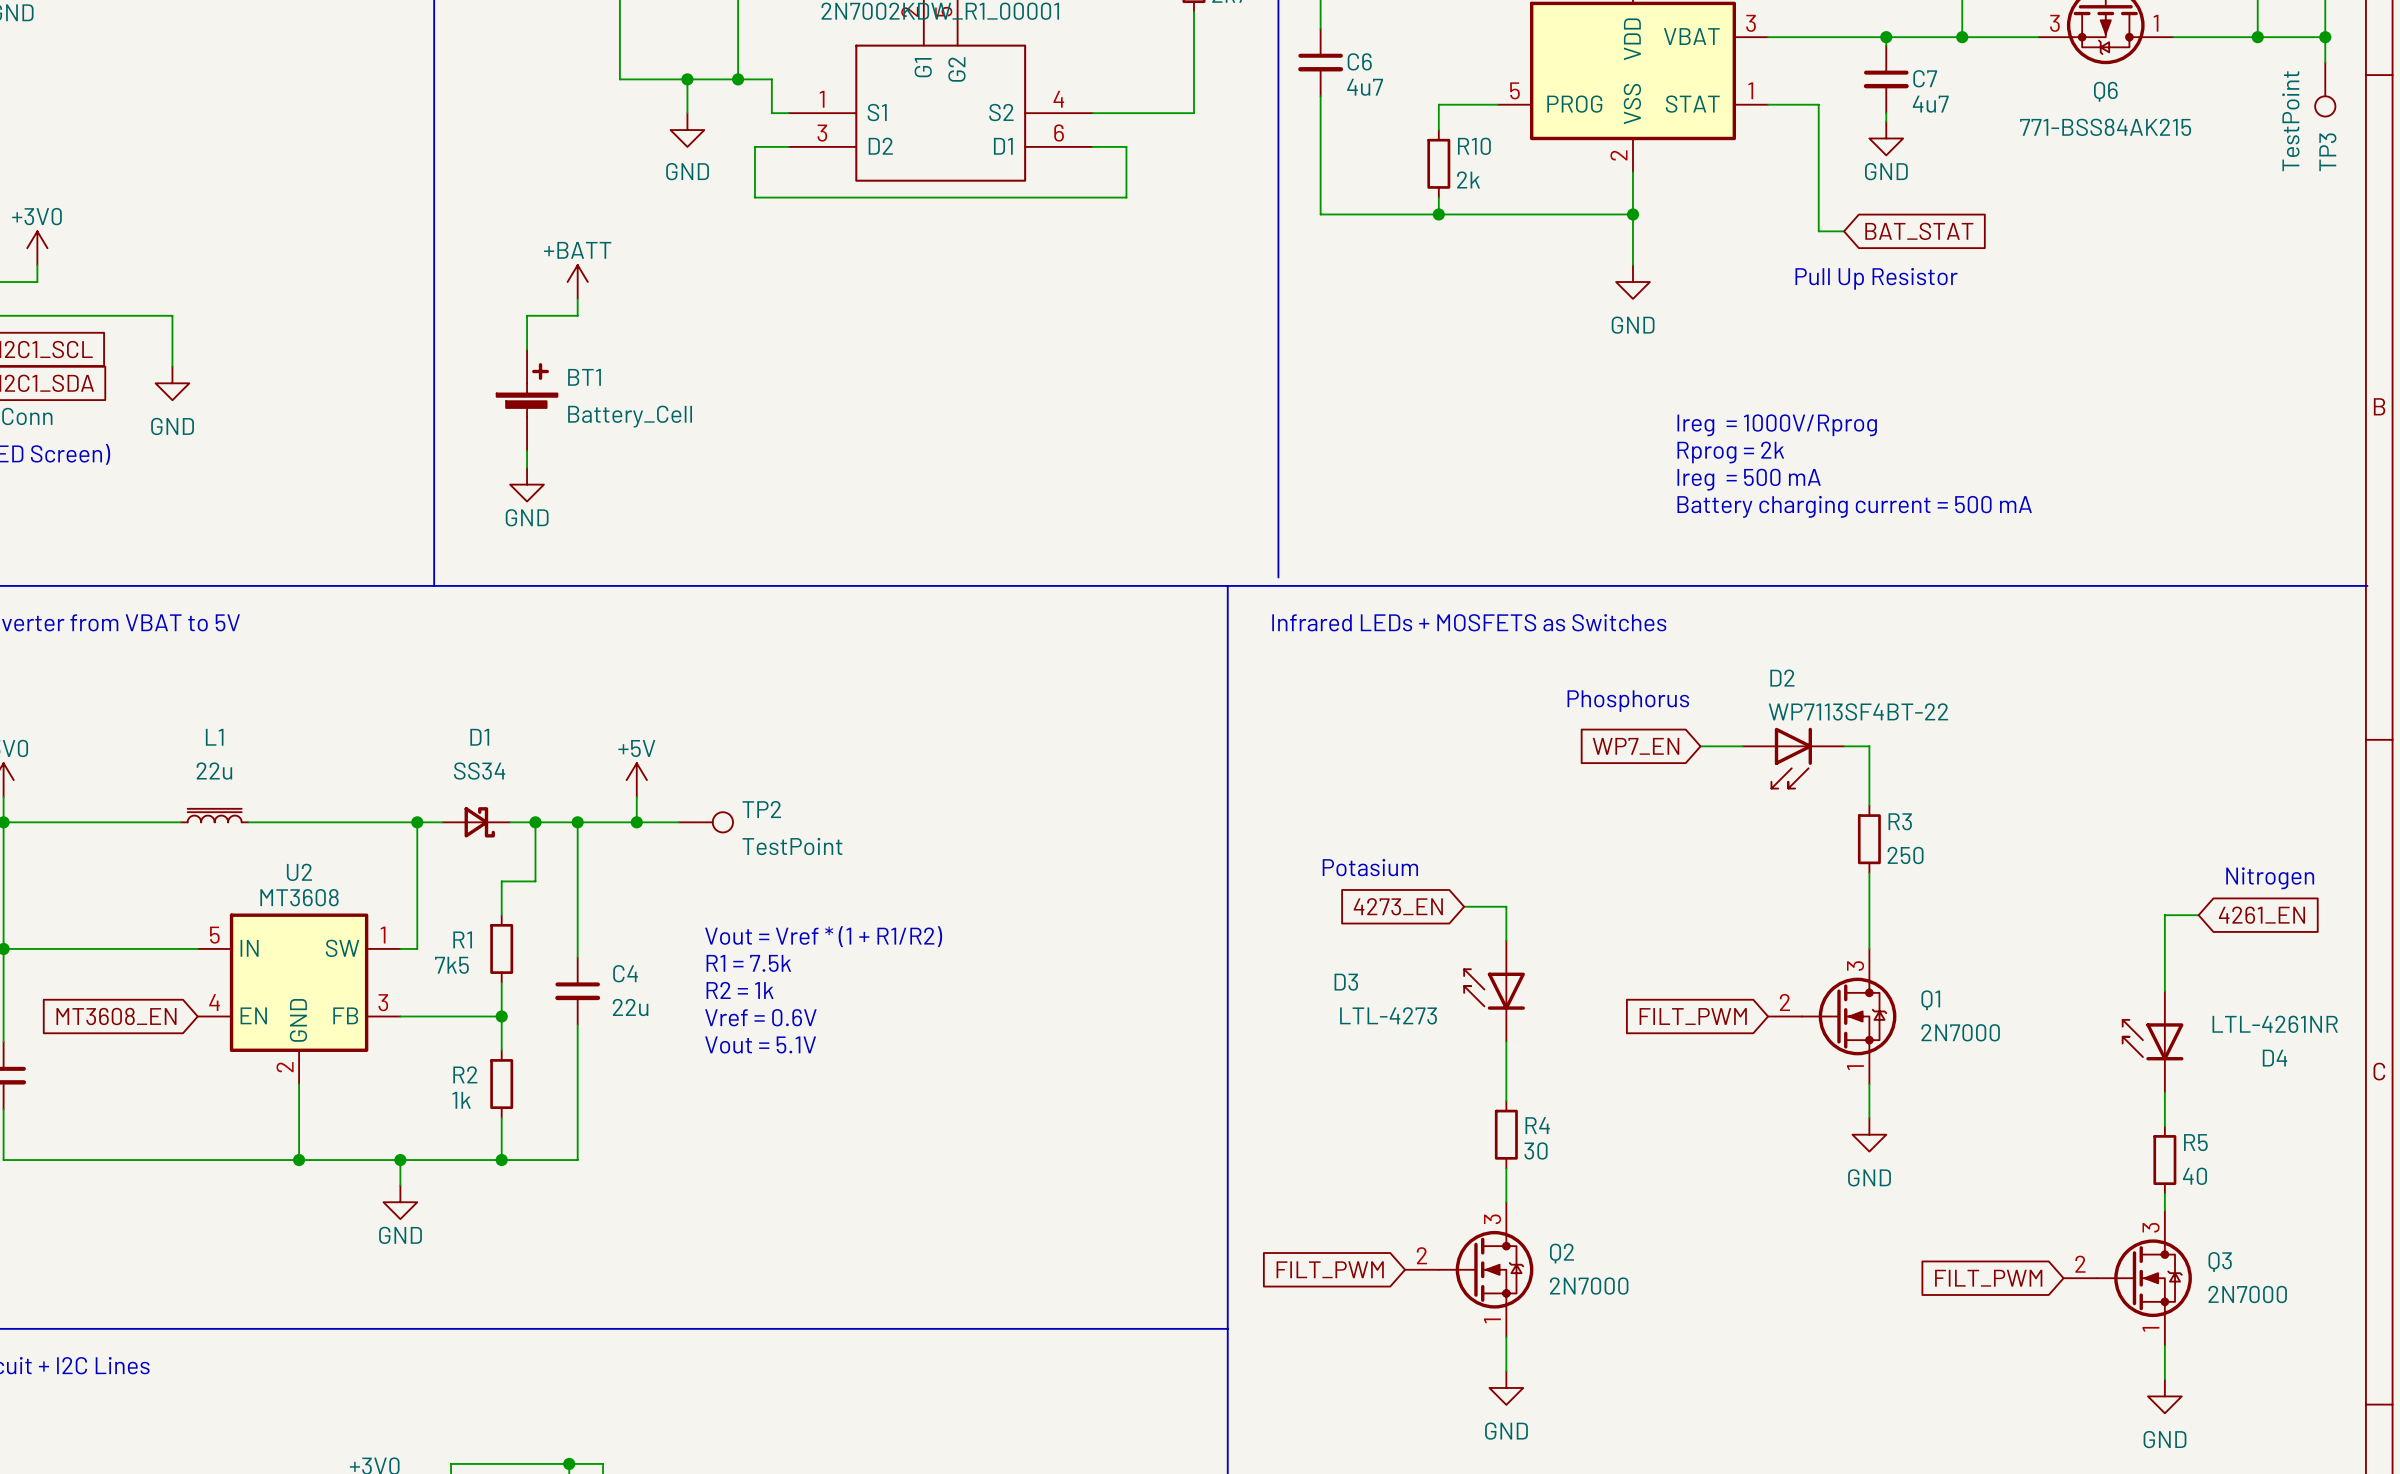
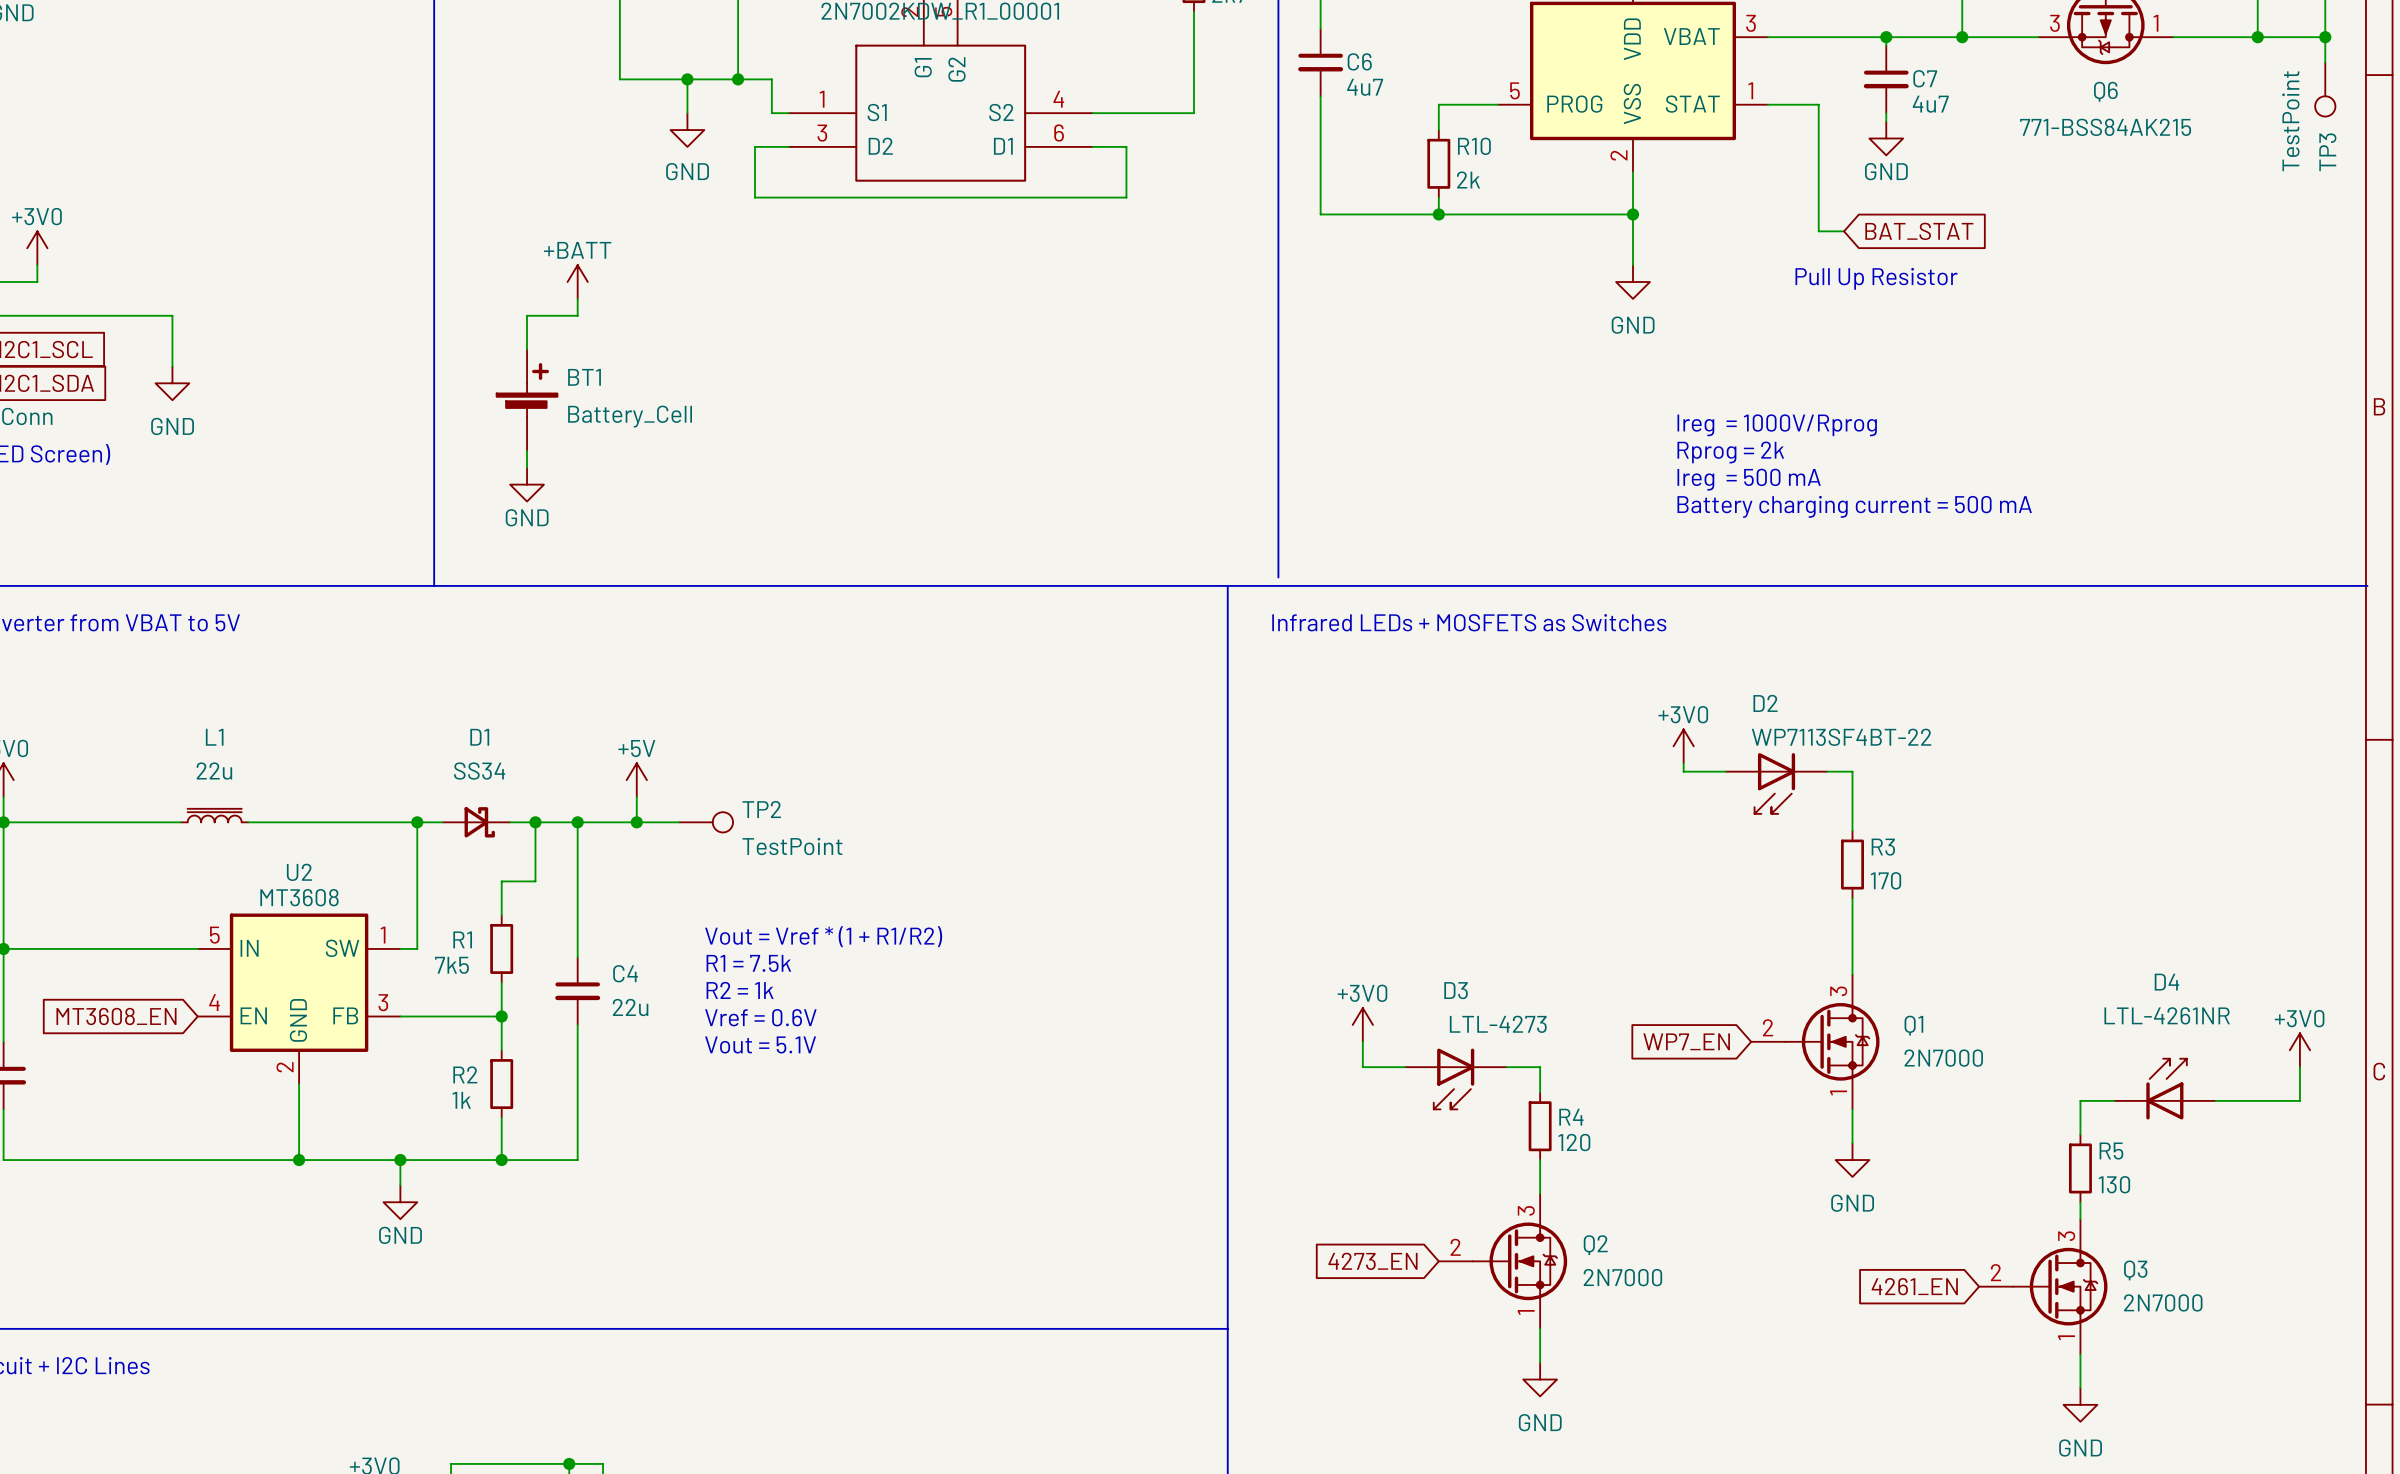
text: Phosphorus (1628, 701) -> none
global label position: WP7_EN (1636, 746) -> WP7_EN (1686, 1041)
power symbol: none -> +3V0 (1683, 746)
wire: (1700, 746) (1742, 746) -> none
wire: (1844, 746) (1869, 746) (1869, 805) -> (1827, 771) (1852, 771) (1852, 830)
D2 position: (1793, 758) -> (1776, 783)
wire: none -> (1683, 763) (1683, 771) (1725, 771)
R3 position: (1869, 839) -> (1852, 864)
R3 value: 250 (1905, 855) -> 170 (1885, 880)
text: Potasium (1370, 867) -> none
wire: (1869, 872) (1869, 948) -> (1852, 898) (1852, 974)
text: Nitrogen (2270, 878) -> none
global label: 4273_EN (1398, 906) -> none
wire: (1464, 906) (1506, 906) (1506, 940) -> none
wire: (2198, 915) (2164, 915) (2164, 991) -> none
global label: 4261_EN (2261, 915) -> none
D3 name position: D3 (1346, 982) -> D3 (1456, 990)
D3 rotation: 0° (1494, 989) -> 90° counterclockwise (1454, 1078)
D3 position: (1494, 991) -> (1455, 1078)
D3 value position: LTL-4273 (1388, 1015) -> LTL-4273 (1498, 1024)
global label: FILT_PWM (1693, 1016) -> none
Q1 position: (1832, 1016) -> (1815, 1041)
power symbol: none -> +3V0 (1362, 1024)
D4 value position: LTL-4261NR (2275, 1024) -> LTL-4261NR (2167, 1015)
D4 rotation: 0° (2153, 1040) -> 90° clockwise (2166, 1089)
wire: none -> (1362, 1041) (1362, 1067) (1405, 1067)
wire: (1506, 1041) (1506, 1100) -> none
power symbol: none -> +3V0 (2299, 1050)
D4 name position: D4 (2275, 1058) -> D4 (2166, 982)
wire: none -> (1506, 1067) (1540, 1067) (1540, 1092)
wire: none -> (2299, 1067) (2299, 1100) (2215, 1100)
wire: (1869, 1084) (1869, 1117) -> (1852, 1109) (1852, 1143)
wire: (2164, 1092) (2164, 1126) -> none
wire: none -> (2114, 1100) (2080, 1100) (2080, 1134)
R4 position: (1506, 1134) -> (1540, 1126)
power symbol position: GND (1869, 1134) -> GND (1852, 1160)
R4 value: 30 (1536, 1150) -> 120 (1574, 1142)
R5 position: (2164, 1160) -> (2080, 1168)
wire: (1506, 1168) (1506, 1202) -> (1540, 1160) (1540, 1193)
R5 value: 40 (2194, 1176) -> 130 (2114, 1184)
wire: (2164, 1193) (2164, 1210) -> (2080, 1202) (2080, 1219)
global label: none -> 4273_EN (1372, 1261)
global label: FILT_PWM (1330, 1269) -> none
Q2 position: (1469, 1269) -> (1502, 1261)
global label: FILT_PWM (1988, 1278) -> none
Q3 position: (2127, 1278) -> (2043, 1286)
global label: none -> 4261_EN (1914, 1286)
wire: (1506, 1337) (1506, 1371) -> (1540, 1328) (1540, 1362)
wire: (2164, 1345) (2164, 1379) -> (2080, 1354) (2080, 1387)
power symbol position: GND (1506, 1387) -> GND (1540, 1379)
power symbol position: GND (2164, 1396) -> GND (2080, 1404)

